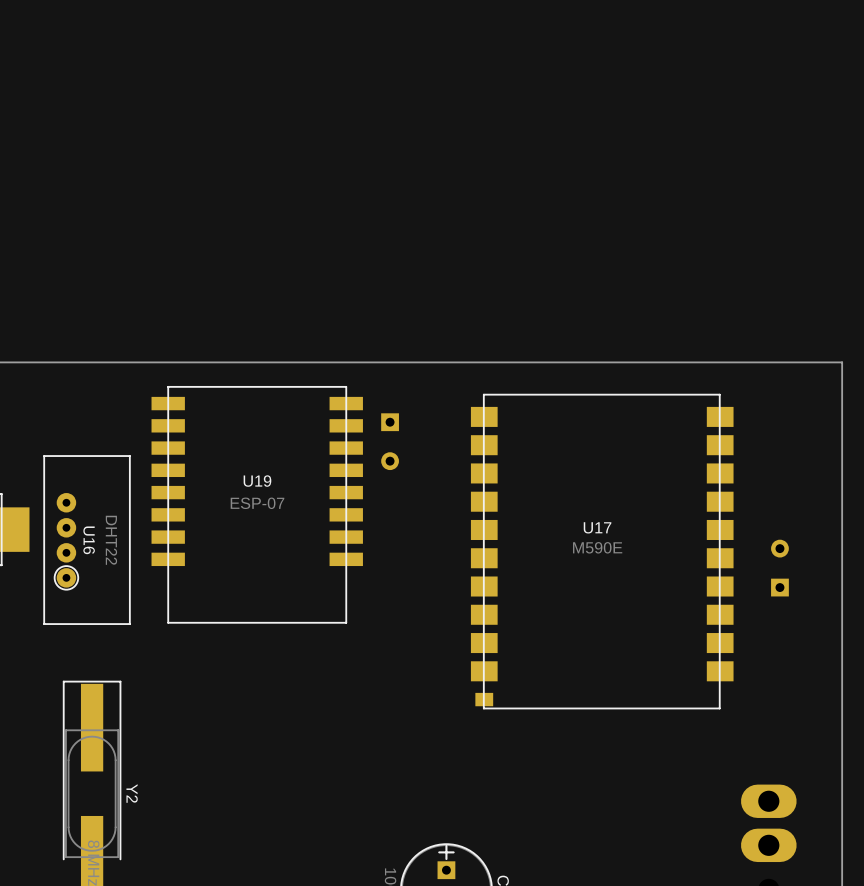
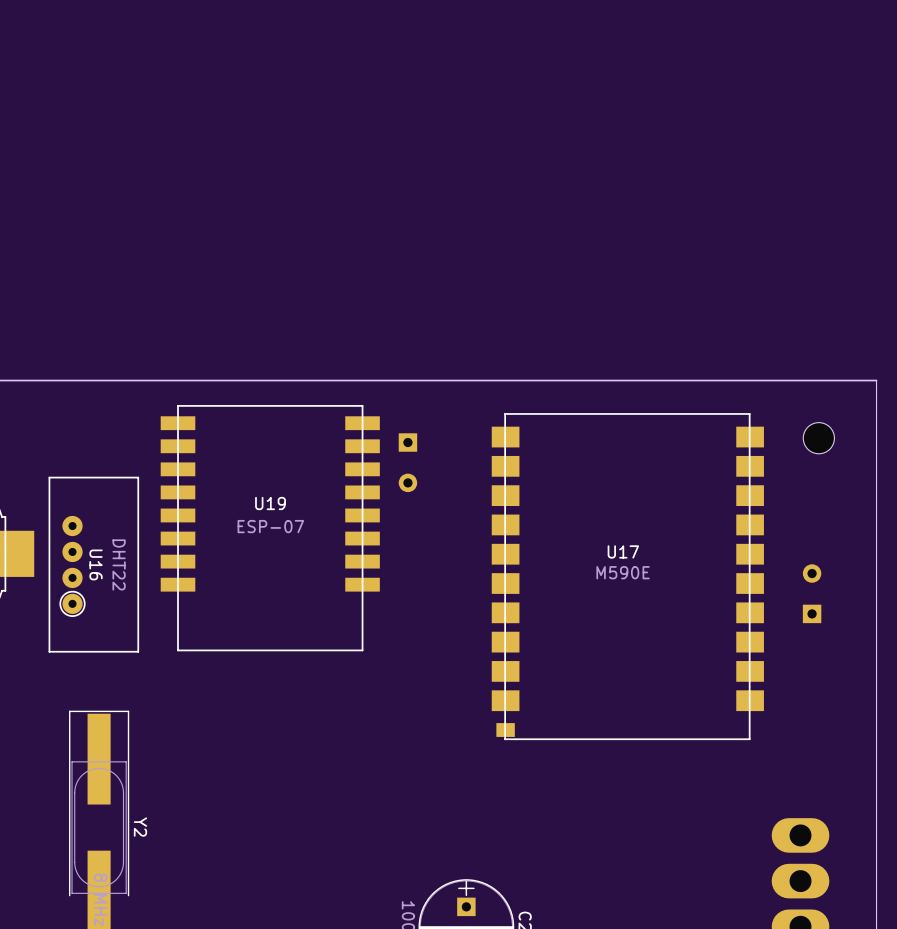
part: none -> (818, 438)

